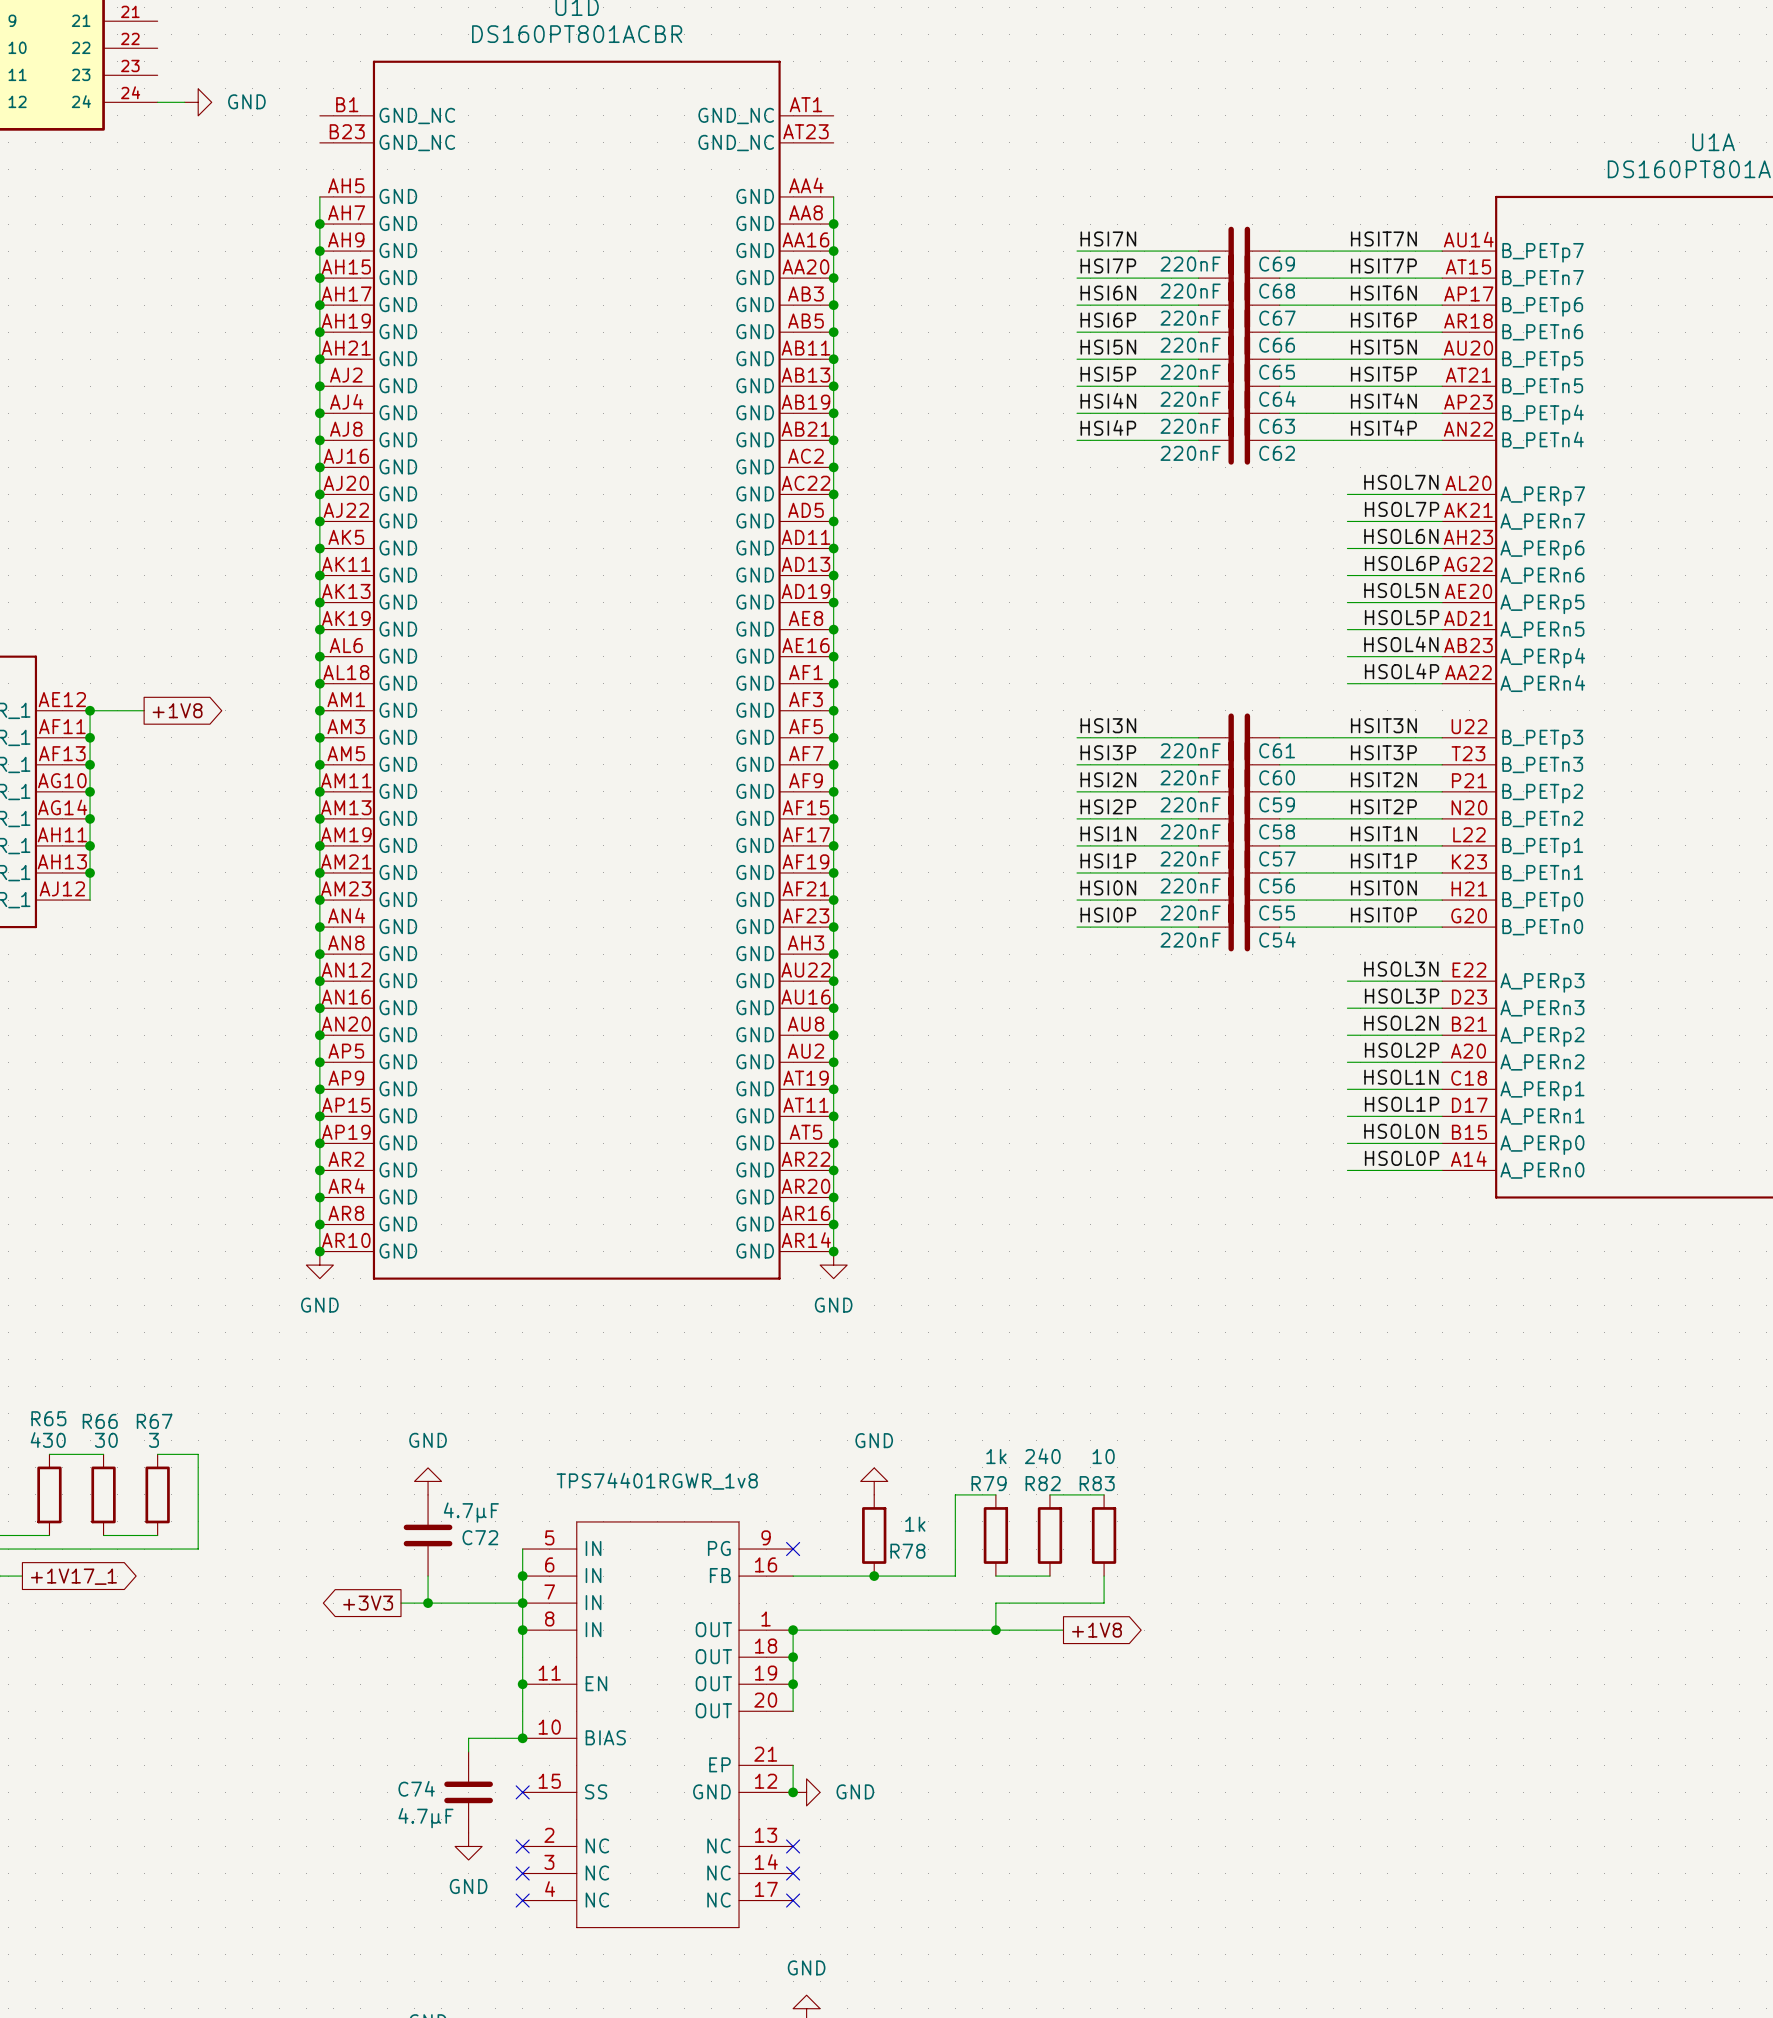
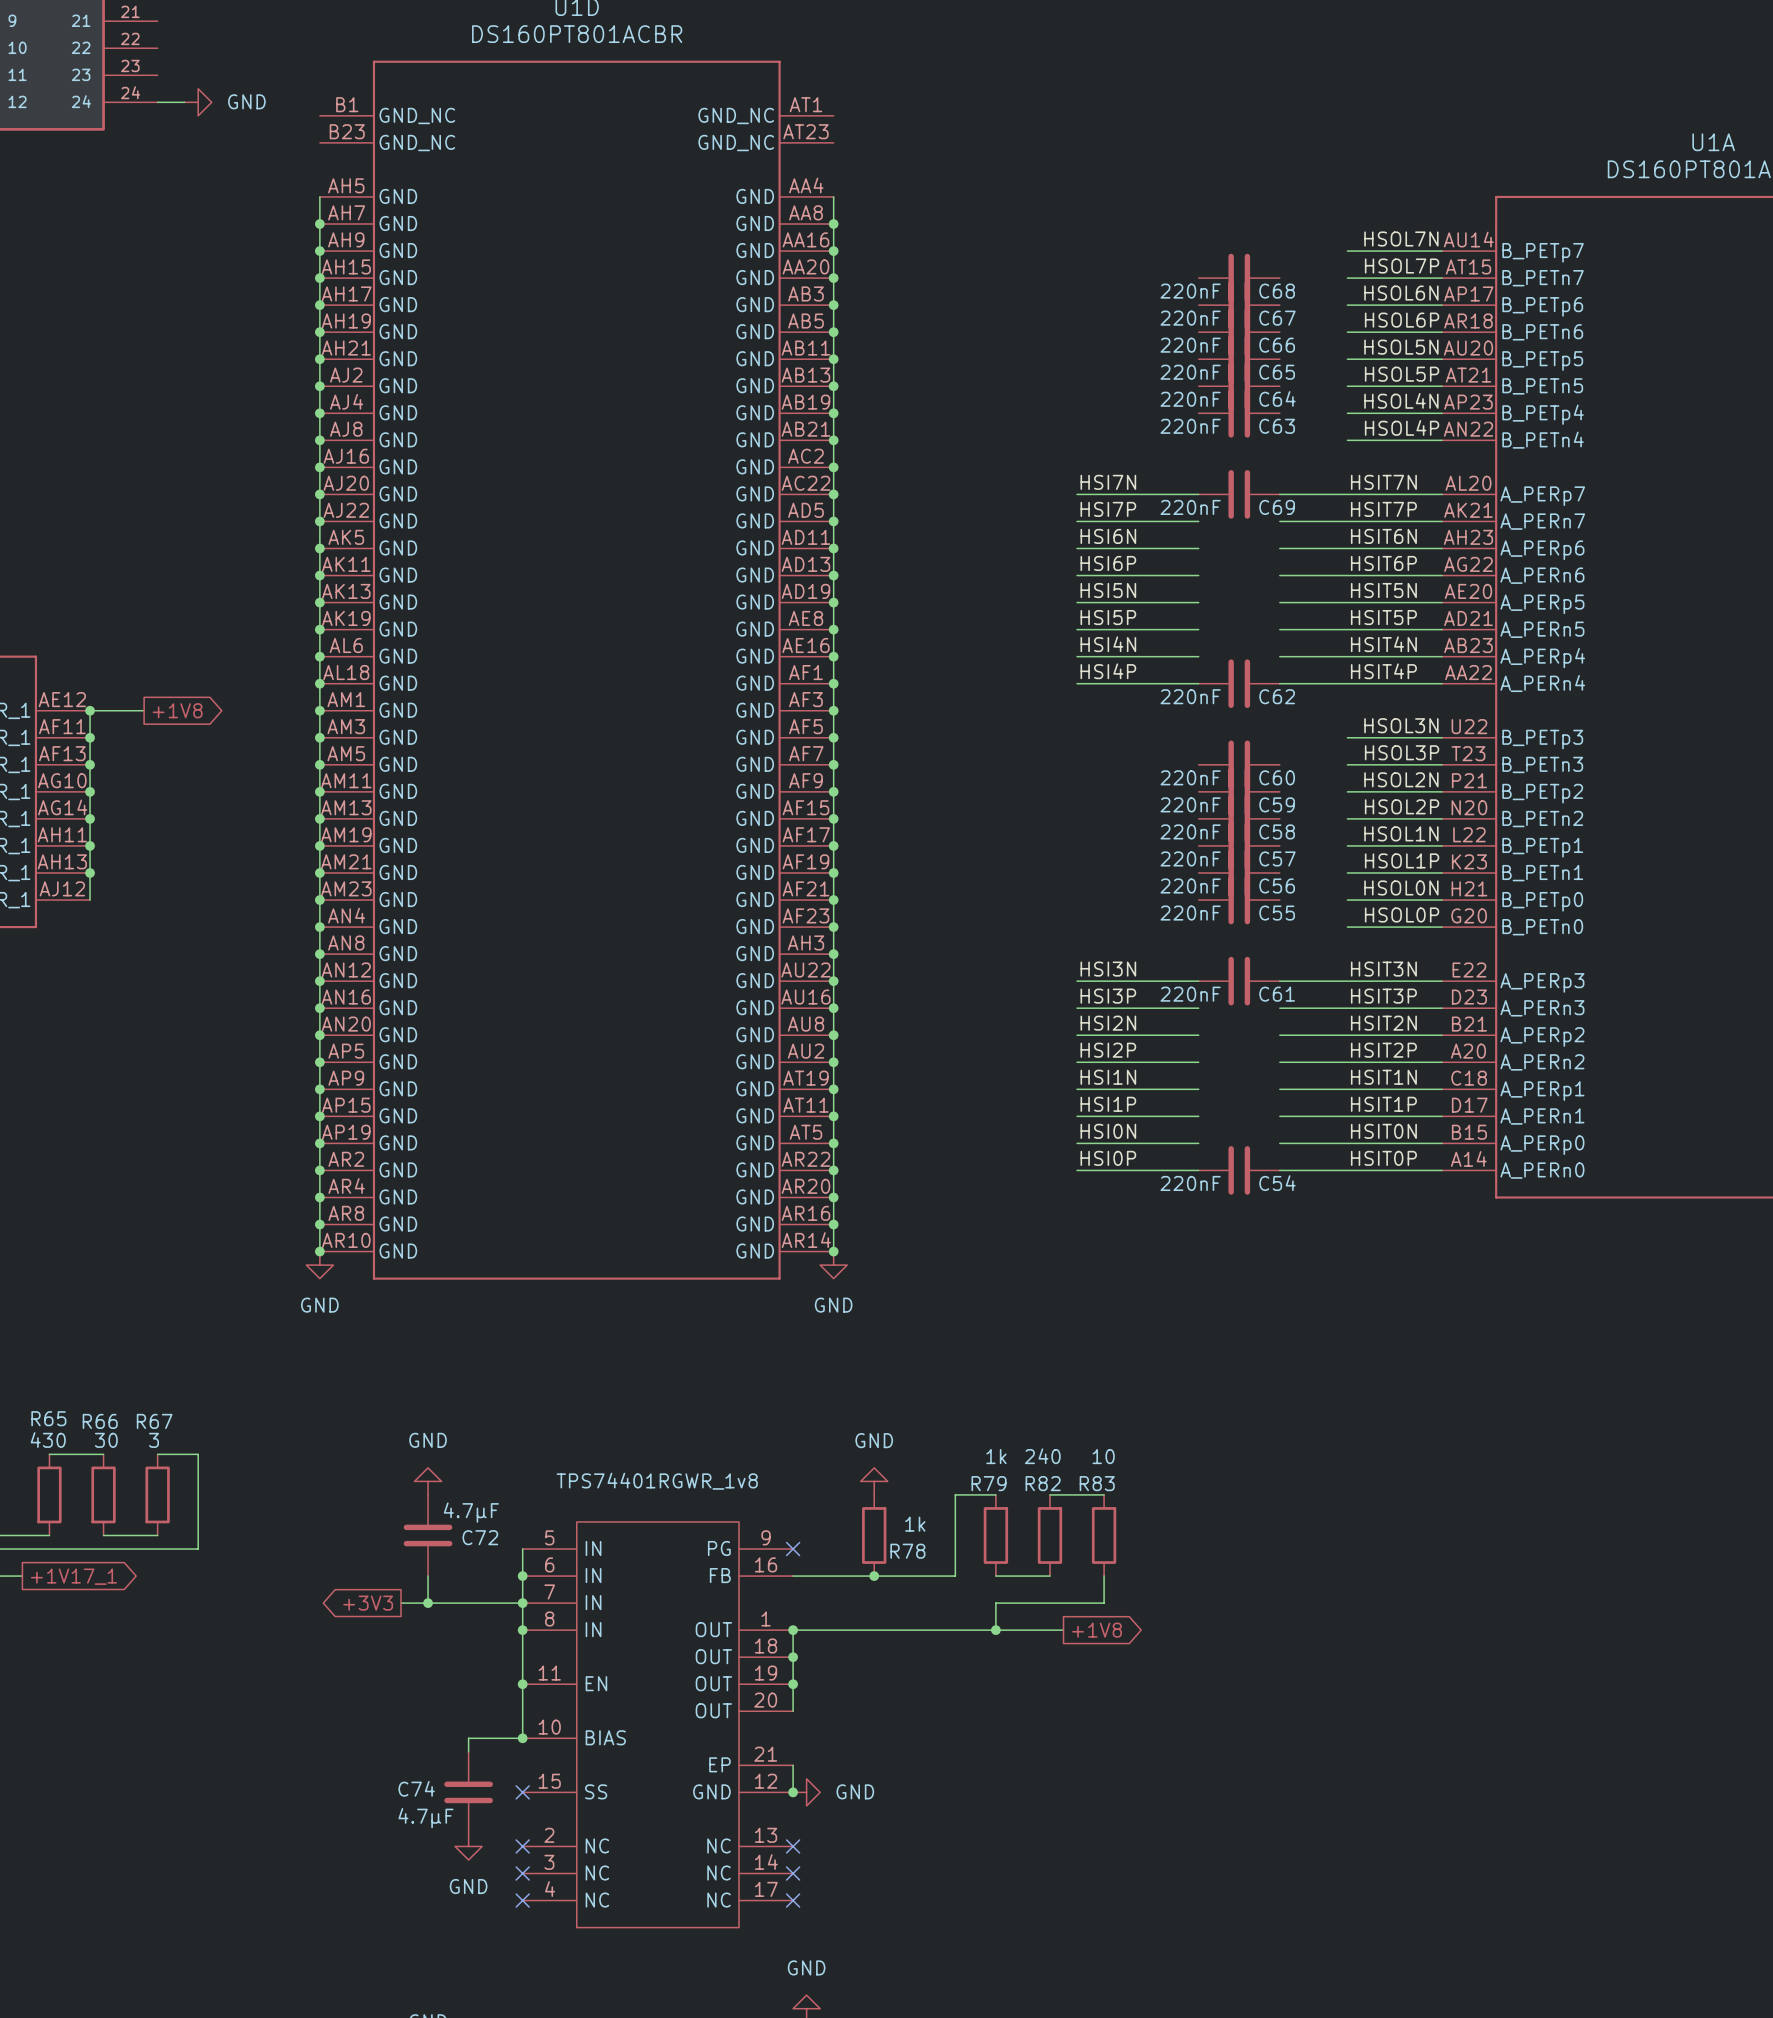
label position: HSI7N (1108, 238) -> HSI7N (1108, 482)
label position: HSIT7N (1383, 238) -> HSIT7N (1383, 482)
wire: (1077, 251) (1198, 251) -> (1077, 494) (1198, 494)
C69 position: (1239, 251) -> (1239, 494)
wire: (1279, 251) (1347, 251) -> (1279, 494) (1347, 494)
label position: HSI7P (1108, 266) -> HSI7P (1108, 509)
label position: HSIT7P (1383, 266) -> HSIT7P (1383, 509)
wire: (1077, 278) (1198, 278) -> (1077, 521) (1198, 521)
wire: (1279, 278) (1347, 278) -> (1279, 521) (1347, 521)
label position: HSI6N (1108, 293) -> HSI6N (1108, 536)
label position: HSIT6N (1383, 293) -> HSIT6N (1383, 536)
wire: (1077, 305) (1198, 305) -> (1077, 548) (1198, 548)
wire: (1279, 305) (1347, 305) -> (1279, 548) (1347, 548)
label position: HSI6P (1108, 320) -> HSI6P (1108, 563)
label position: HSIT6P (1383, 320) -> HSIT6P (1383, 563)
wire: (1077, 332) (1198, 332) -> (1077, 575) (1198, 575)
wire: (1279, 332) (1347, 332) -> (1279, 575) (1347, 575)
label position: HSI5N (1108, 347) -> HSI5N (1108, 590)
label position: HSIT5N (1383, 347) -> HSIT5N (1383, 590)
wire: (1077, 359) (1198, 359) -> (1077, 602) (1198, 602)
wire: (1279, 359) (1347, 359) -> (1279, 602) (1347, 602)
label position: HSI5P (1108, 374) -> HSI5P (1108, 617)
label position: HSIT5P (1383, 374) -> HSIT5P (1383, 617)
wire: (1077, 386) (1198, 386) -> (1077, 629) (1198, 629)
wire: (1279, 386) (1347, 386) -> (1279, 629) (1347, 629)
label position: HSI4N (1108, 400) -> HSI4N (1108, 644)
label position: HSIT4N (1383, 400) -> HSIT4N (1383, 644)
wire: (1077, 413) (1198, 413) -> (1077, 656) (1198, 656)
wire: (1279, 413) (1347, 413) -> (1279, 656) (1347, 656)
label position: HSI4P (1108, 427) -> HSI4P (1108, 671)
label position: HSIT4P (1383, 427) -> HSIT4P (1383, 671)
wire: (1077, 440) (1198, 440) -> (1077, 683) (1198, 683)
C62 position: (1239, 440) -> (1239, 683)
wire: (1279, 440) (1347, 440) -> (1279, 683) (1347, 683)
label position: HSOL7N (1401, 482) -> HSOL7N (1401, 238)
label position: HSOL7P (1402, 509) -> HSOL7P (1402, 266)
label position: HSOL6N (1401, 536) -> HSOL6N (1401, 293)
label position: HSOL6P (1402, 563) -> HSOL6P (1402, 320)
label position: HSOL5N (1401, 590) -> HSOL5N (1401, 347)
label position: HSOL5P (1402, 617) -> HSOL5P (1402, 374)
label position: HSOL4N (1401, 644) -> HSOL4N (1401, 400)
label position: HSOL4P (1402, 671) -> HSOL4P (1402, 427)
label position: HSI3N (1108, 725) -> HSI3N (1108, 969)
label position: HSIT3N (1383, 725) -> HSIT3N (1383, 969)
wire: (1077, 737) (1198, 737) -> (1077, 981) (1198, 981)
C61 position: (1239, 737) -> (1239, 981)
wire: (1279, 737) (1347, 737) -> (1279, 981) (1347, 981)
label position: HSI3P (1108, 752) -> HSI3P (1108, 996)
label position: HSIT3P (1383, 752) -> HSIT3P (1383, 996)
wire: (1077, 764) (1198, 764) -> (1077, 1008) (1198, 1008)
wire: (1279, 764) (1347, 764) -> (1279, 1008) (1347, 1008)
label position: HSI2N (1108, 779) -> HSI2N (1108, 1023)
label position: HSIT2N (1383, 779) -> HSIT2N (1383, 1023)
wire: (1077, 791) (1198, 791) -> (1077, 1035) (1198, 1035)
wire: (1279, 791) (1347, 791) -> (1279, 1035) (1347, 1035)
label position: HSI2P (1108, 806) -> HSI2P (1108, 1050)
label position: HSIT2P (1383, 806) -> HSIT2P (1383, 1050)
wire: (1077, 818) (1198, 818) -> (1077, 1062) (1198, 1062)
wire: (1279, 818) (1347, 818) -> (1279, 1062) (1347, 1062)
label position: HSI1N (1108, 833) -> HSI1N (1108, 1077)
label position: HSIT1N (1383, 833) -> HSIT1N (1383, 1077)
wire: (1077, 845) (1198, 845) -> (1077, 1089) (1198, 1089)
wire: (1279, 845) (1347, 845) -> (1279, 1089) (1347, 1089)
label position: HSI1P (1108, 860) -> HSI1P (1108, 1104)
label position: HSIT1P (1383, 860) -> HSIT1P (1383, 1104)
wire: (1077, 872) (1198, 872) -> (1077, 1116) (1198, 1116)
wire: (1279, 872) (1347, 872) -> (1279, 1116) (1347, 1116)
label position: HSI0N (1108, 887) -> HSI0N (1108, 1131)
label position: HSIT0N (1383, 887) -> HSIT0N (1383, 1131)
wire: (1077, 900) (1198, 900) -> (1077, 1143) (1198, 1143)
wire: (1279, 900) (1347, 900) -> (1279, 1143) (1347, 1143)
label position: HSI0P (1108, 915) -> HSI0P (1108, 1158)
label position: HSIT0P (1383, 915) -> HSIT0P (1383, 1158)
wire: (1077, 927) (1198, 927) -> (1077, 1170) (1198, 1170)
C54 position: (1239, 927) -> (1239, 1170)
wire: (1279, 927) (1347, 927) -> (1279, 1170) (1347, 1170)
label position: HSOL3N (1401, 969) -> HSOL3N (1401, 725)
label position: HSOL3P (1402, 996) -> HSOL3P (1402, 752)
label position: HSOL2N (1401, 1023) -> HSOL2N (1401, 779)
label position: HSOL2P (1402, 1050) -> HSOL2P (1402, 806)
label position: HSOL1N (1401, 1077) -> HSOL1N (1401, 833)
label position: HSOL1P (1402, 1104) -> HSOL1P (1402, 860)
label position: HSOL0N (1401, 1131) -> HSOL0N (1401, 887)
label position: HSOL0P (1402, 1158) -> HSOL0P (1402, 915)

